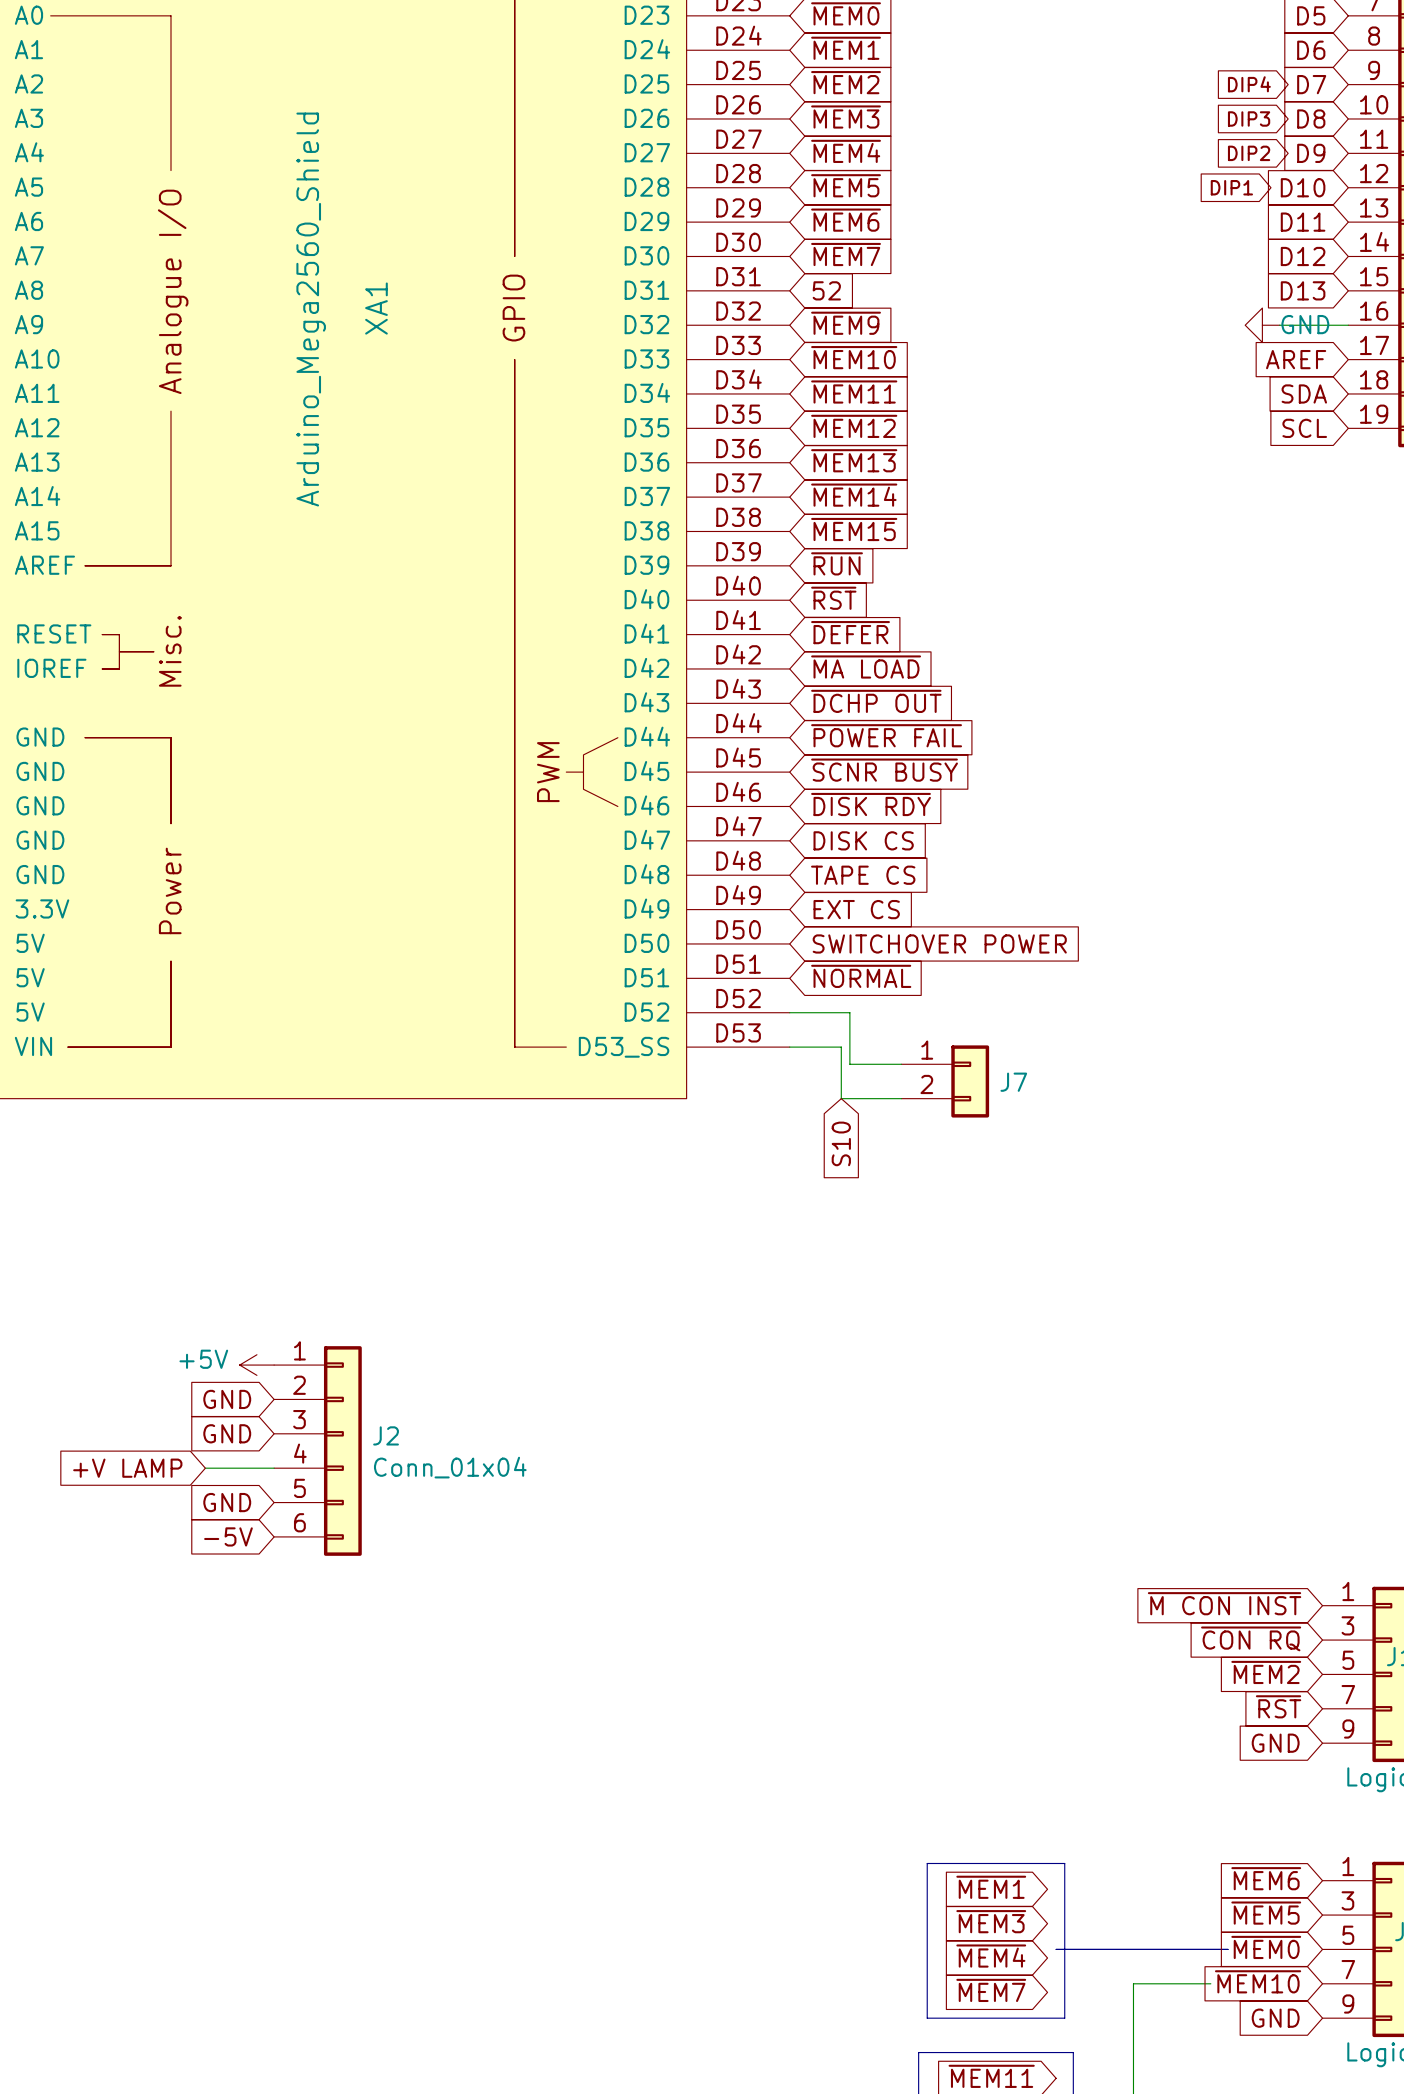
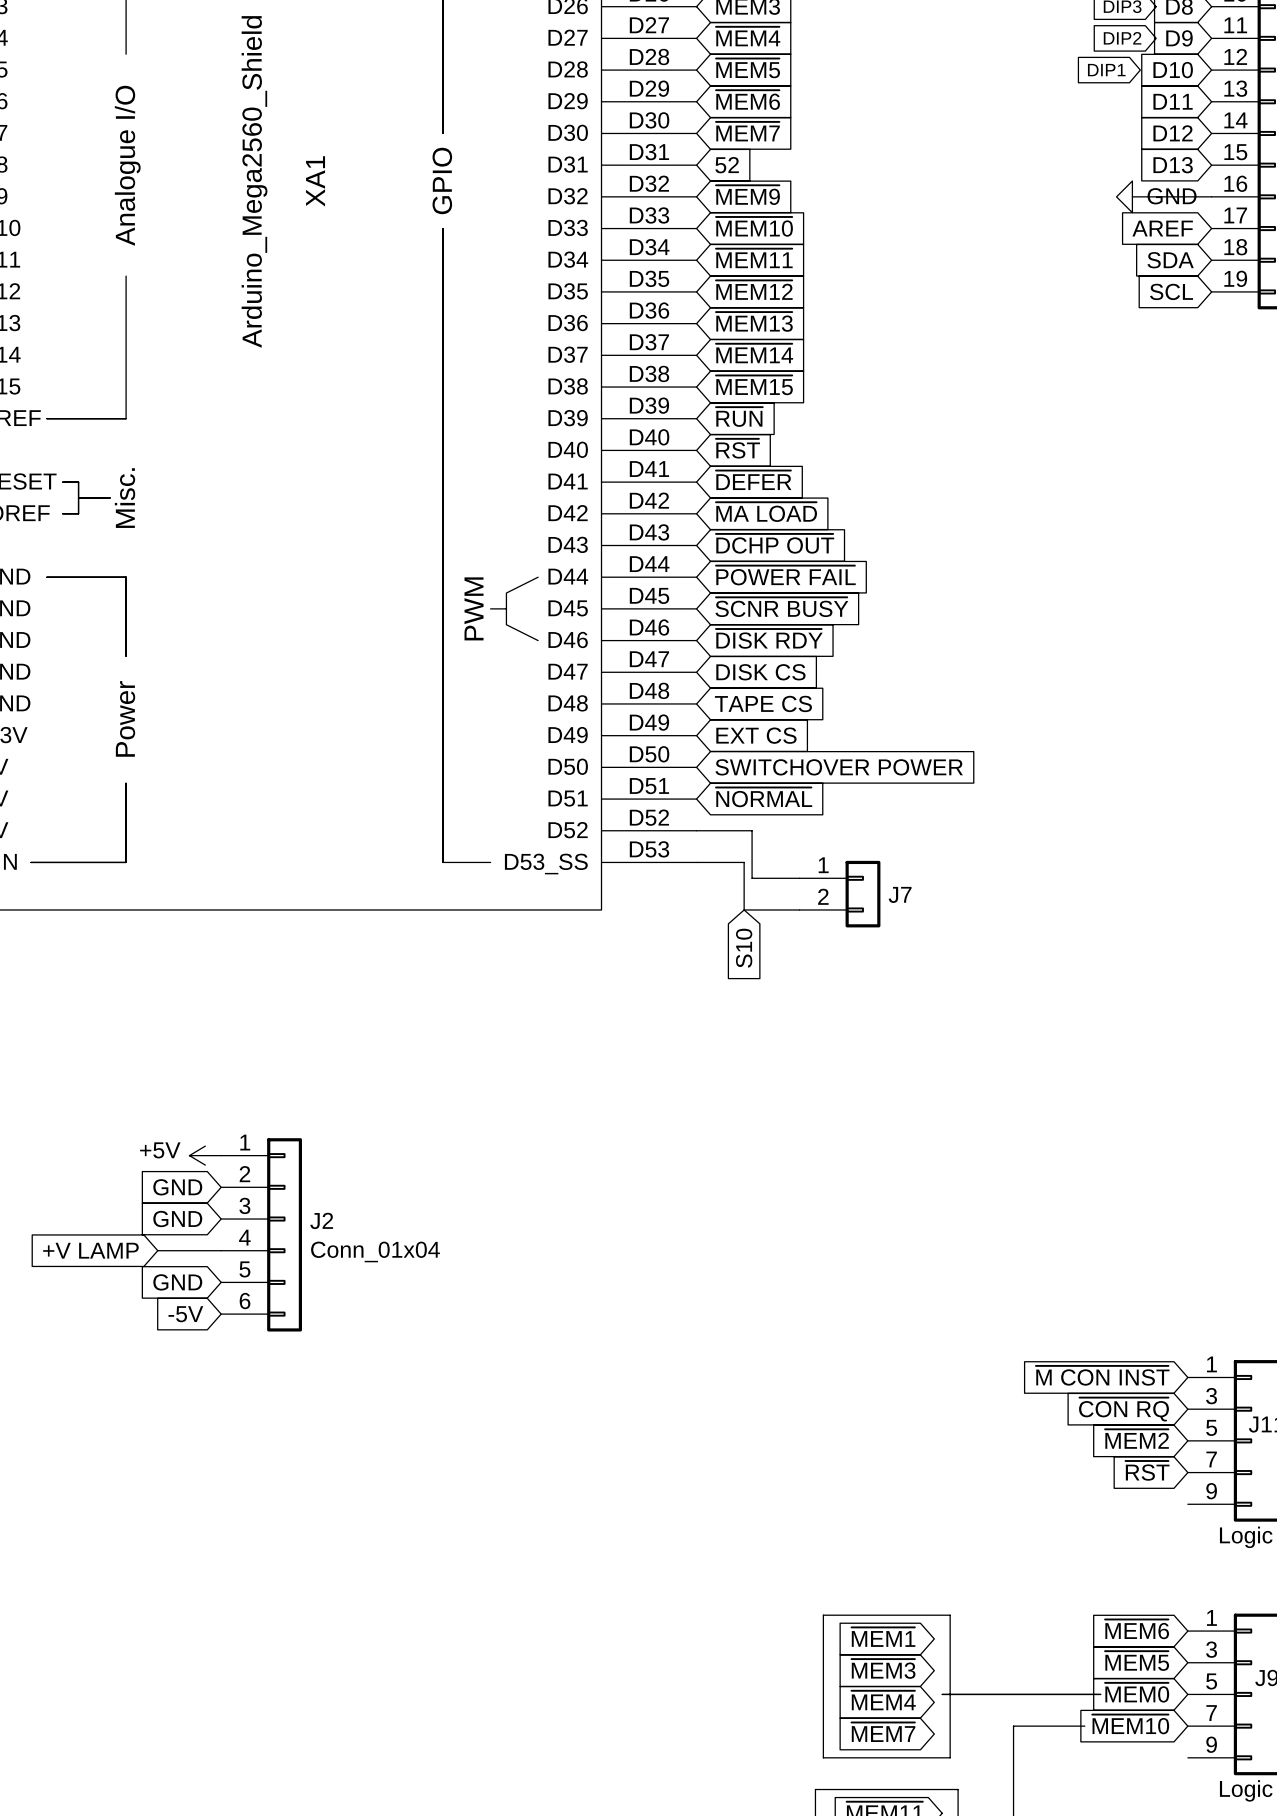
global label: GND (1275, 1743) -> none
global label: GND (1275, 2018) -> none

